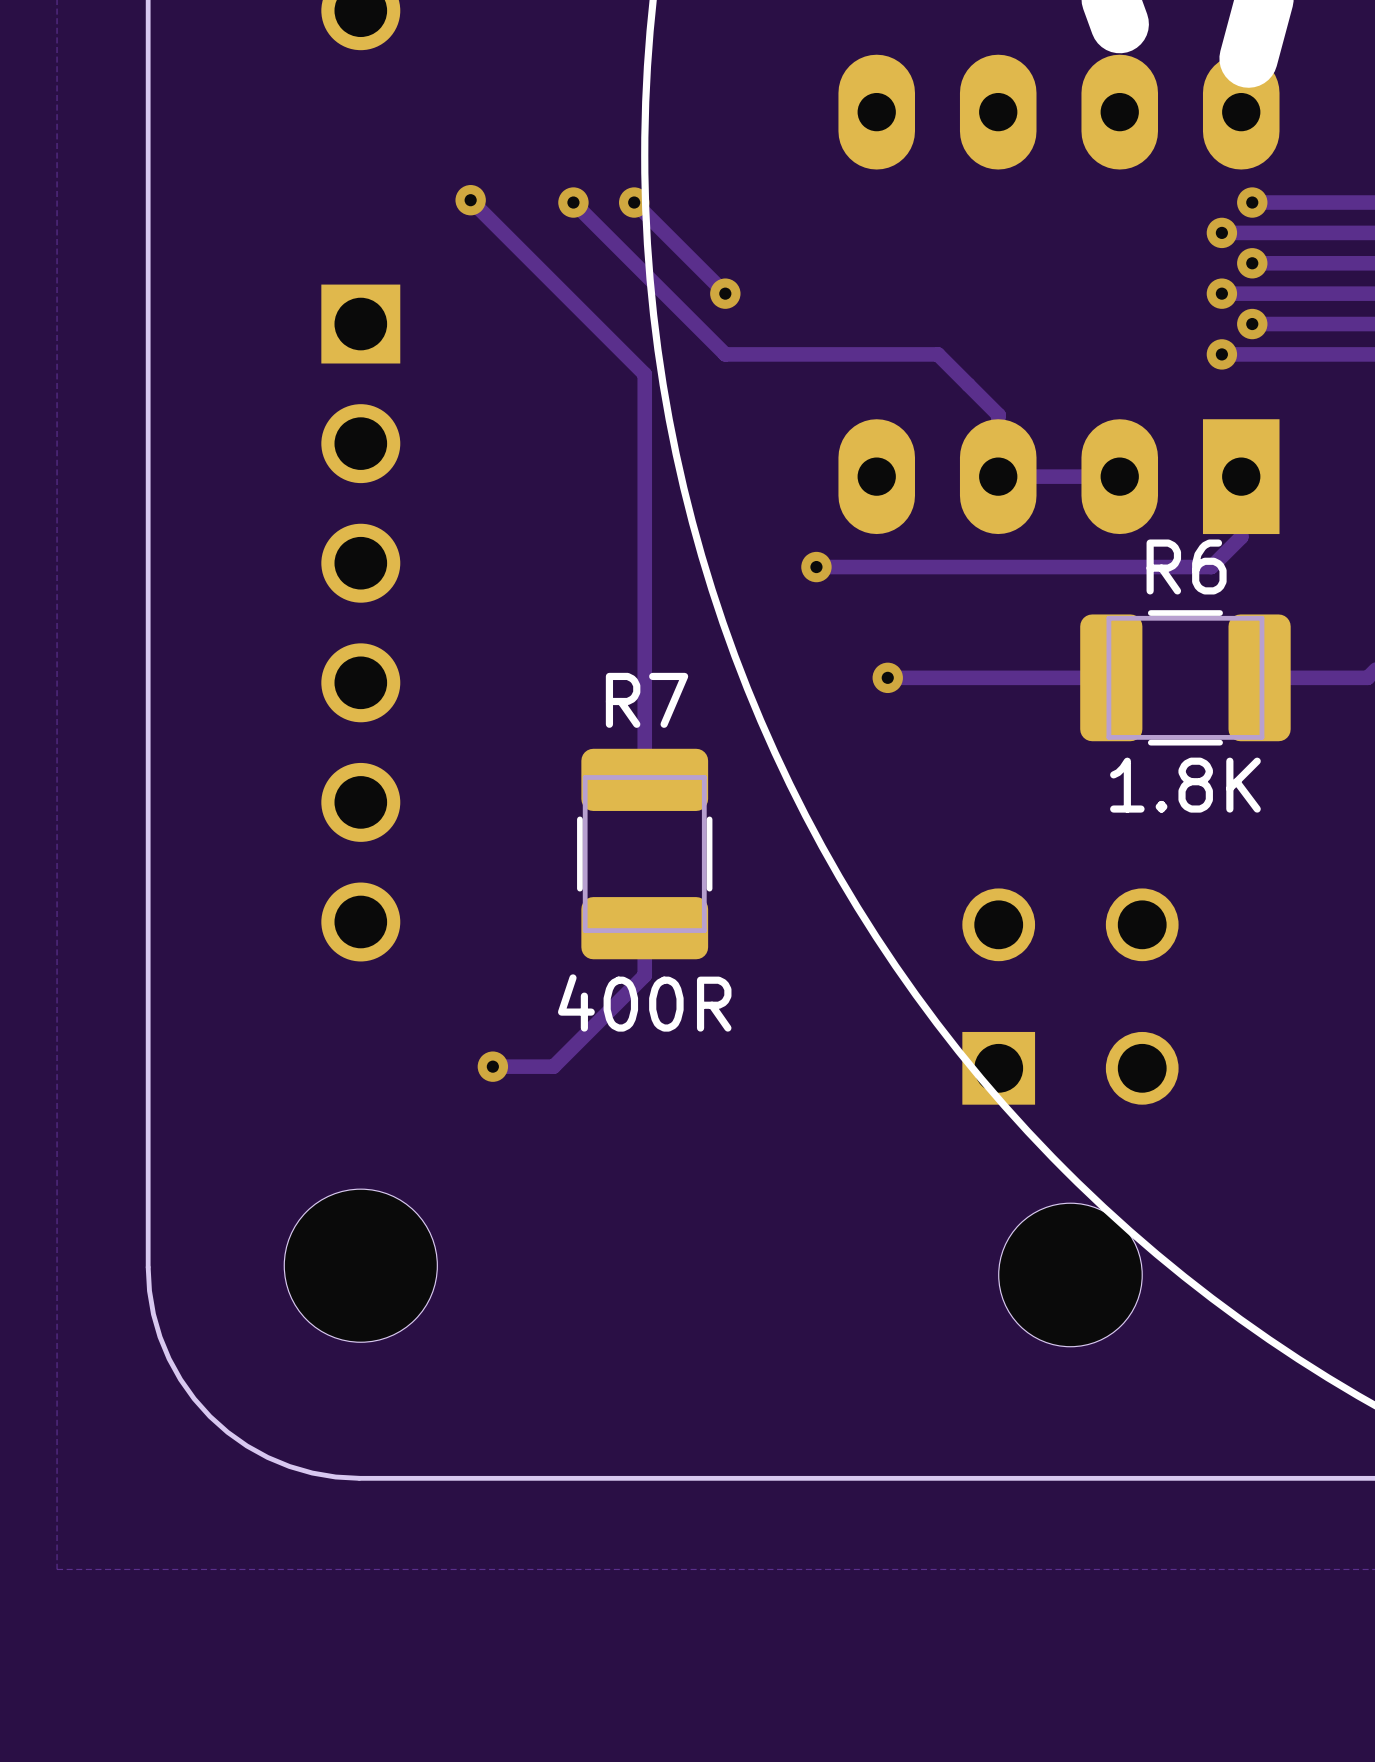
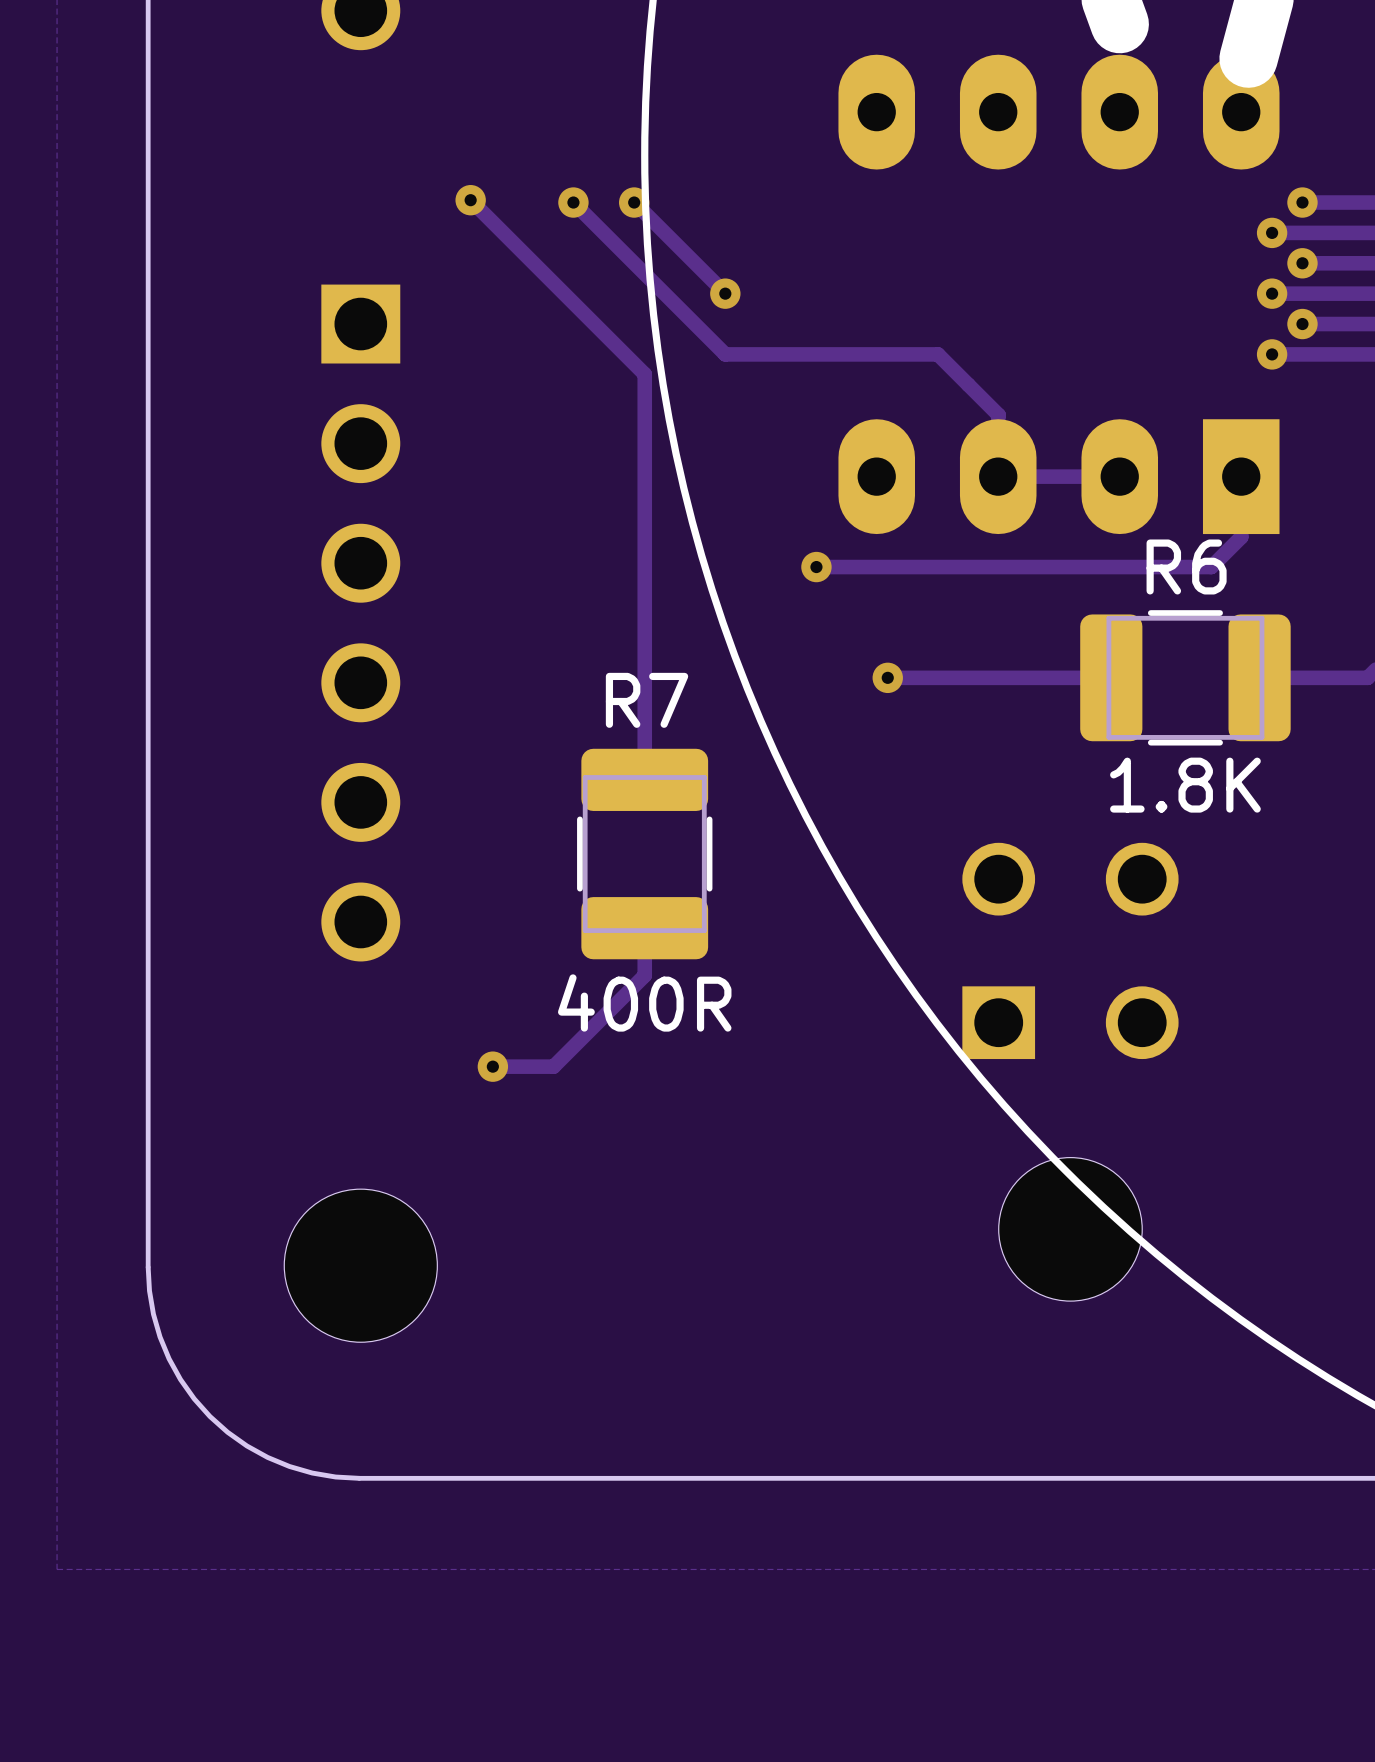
via: (1252, 202) -> none
track: (1302, 202) (1252, 202) -> none
via: none -> (1302, 202)
via: (1221, 232) -> none
track: (1272, 232) (1221, 232) -> none
via: none -> (1272, 232)
via position: (1252, 263) -> (1272, 293)
track: (1302, 263) (1252, 263) -> none
via: none -> (1302, 263)
via: (1221, 293) -> none
track: (1272, 293) (1221, 293) -> none
via: (1252, 324) -> none
track: (1302, 324) (1252, 324) -> none
via: none -> (1302, 324)
via: (1221, 354) -> none
track: (1272, 354) (1221, 354) -> none
via: none -> (1272, 354)
part position: (1070, 1117) -> (1070, 1071)

